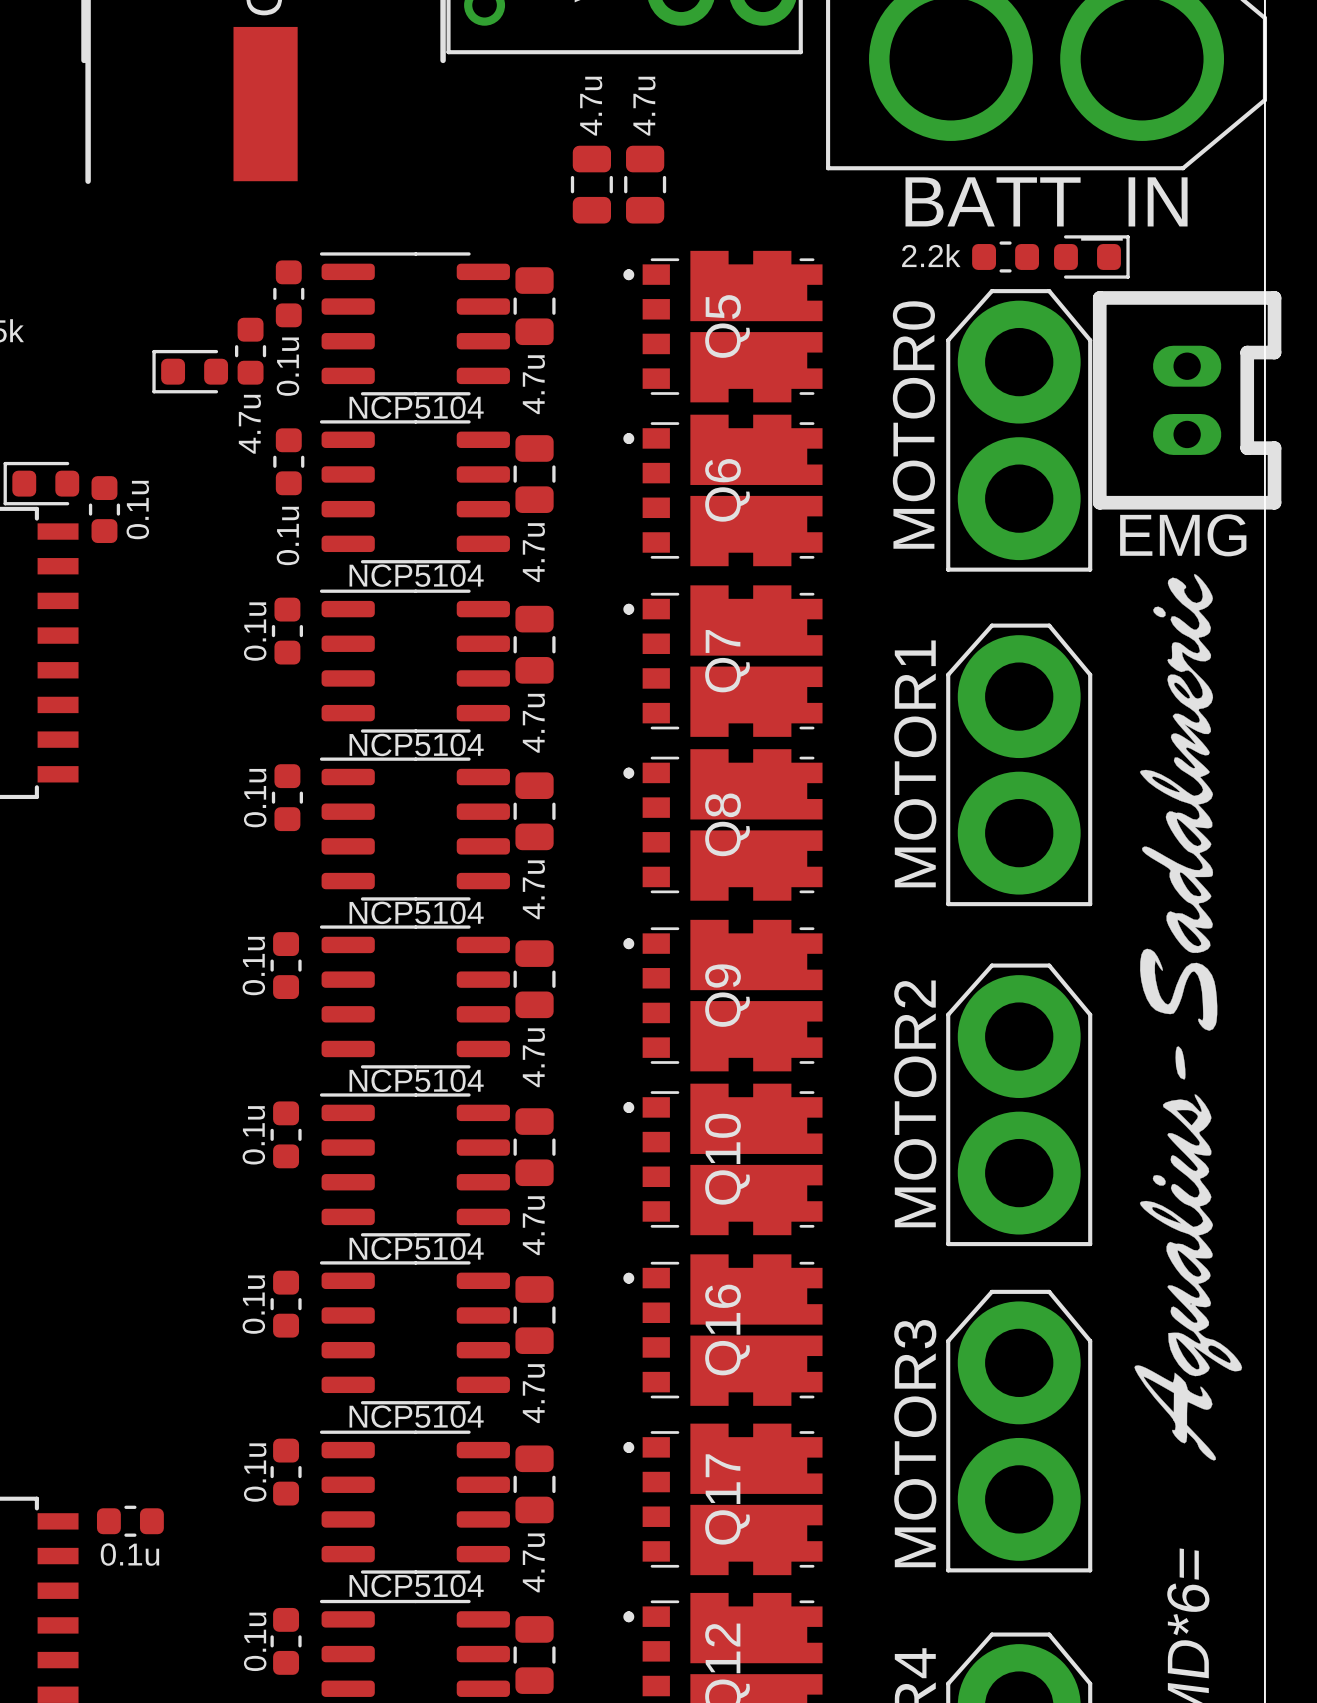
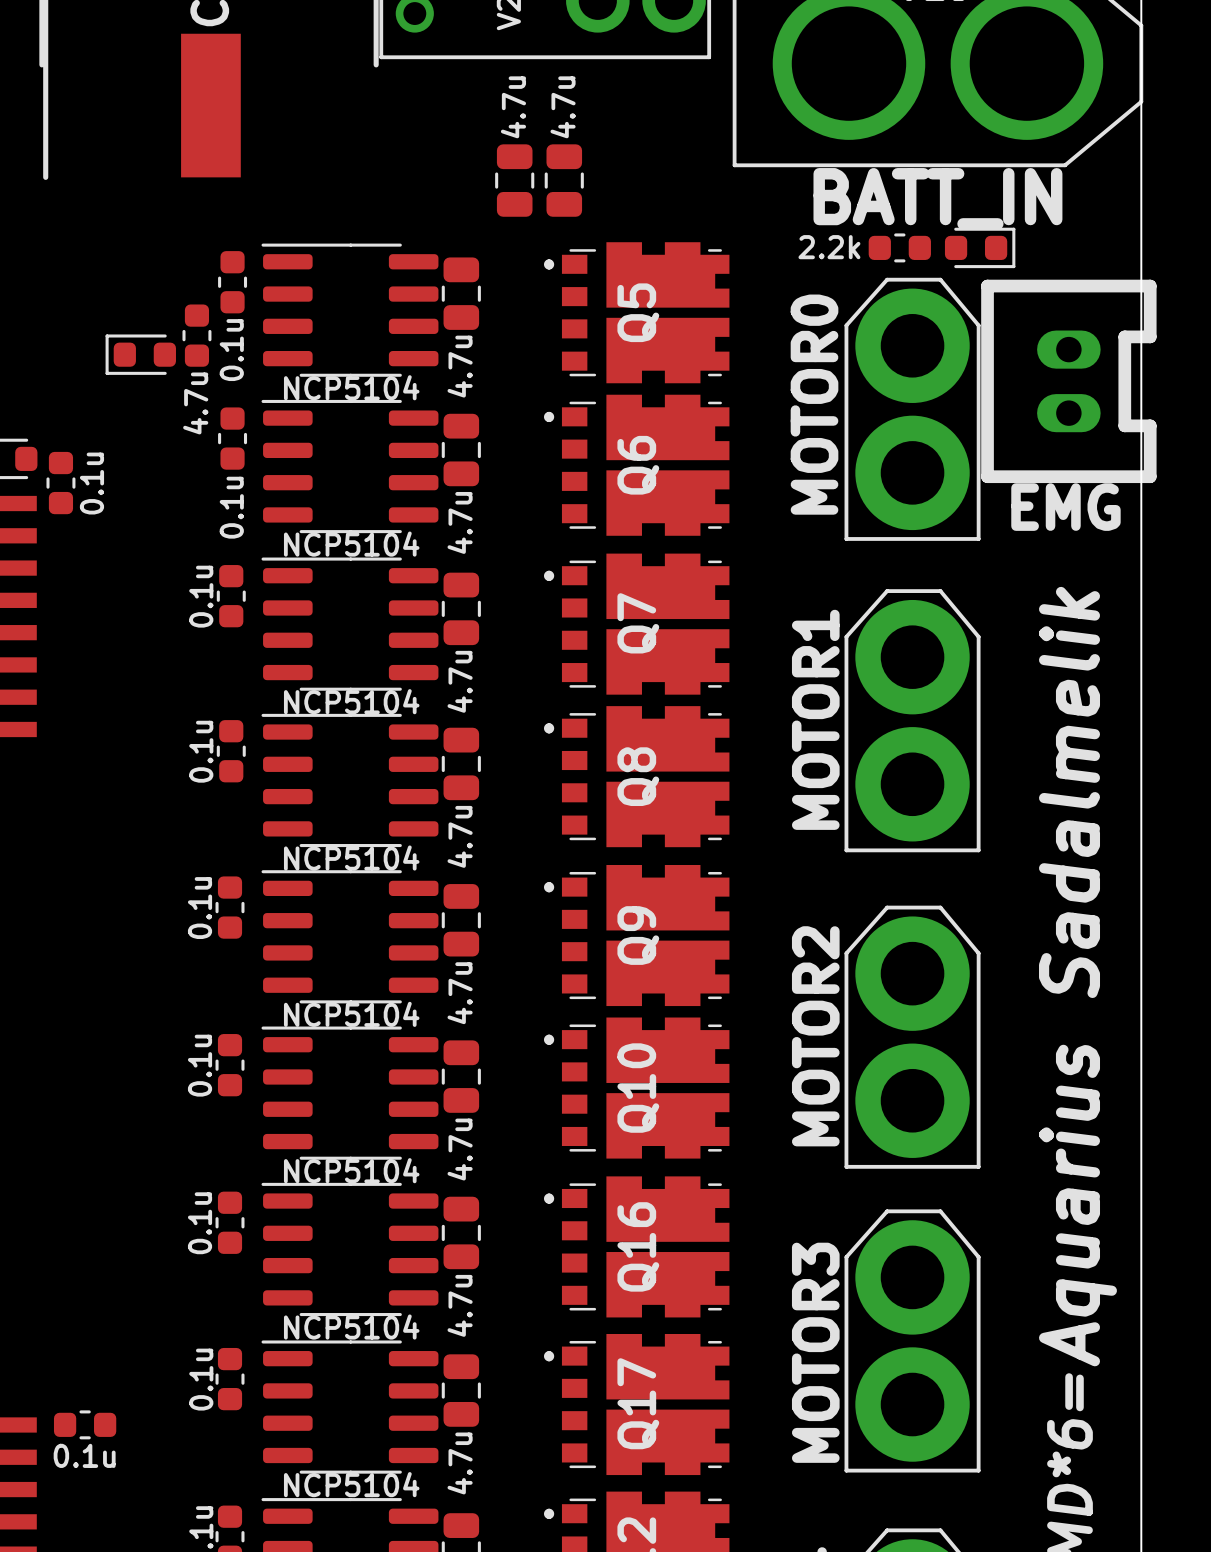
drawing: [1134, 574, 1243, 1461] -> none
text: none -> Aquarius Sadalmelik (1077, 976)

